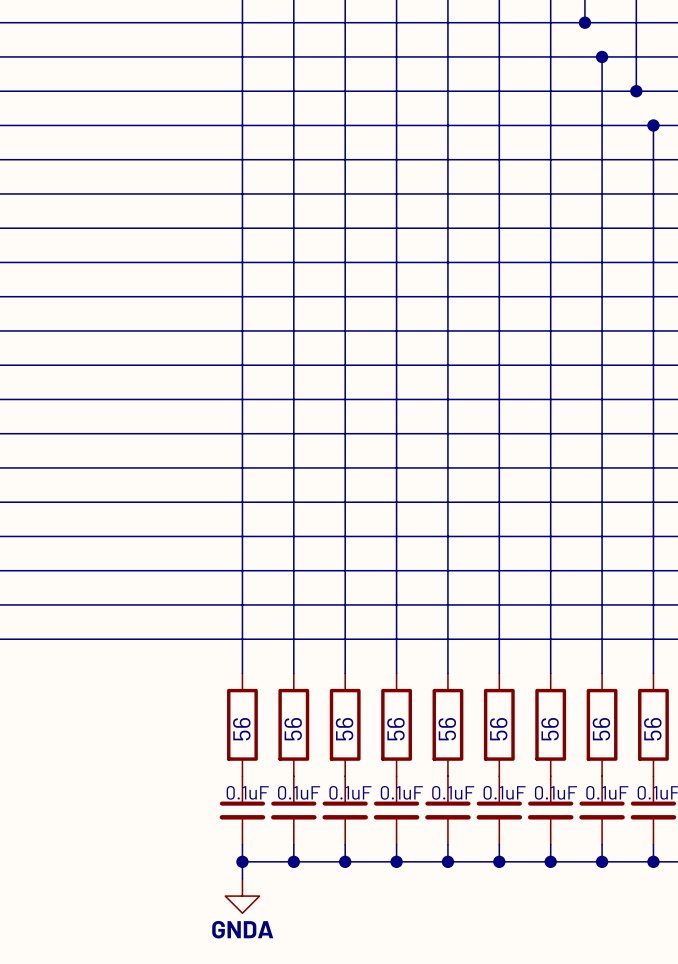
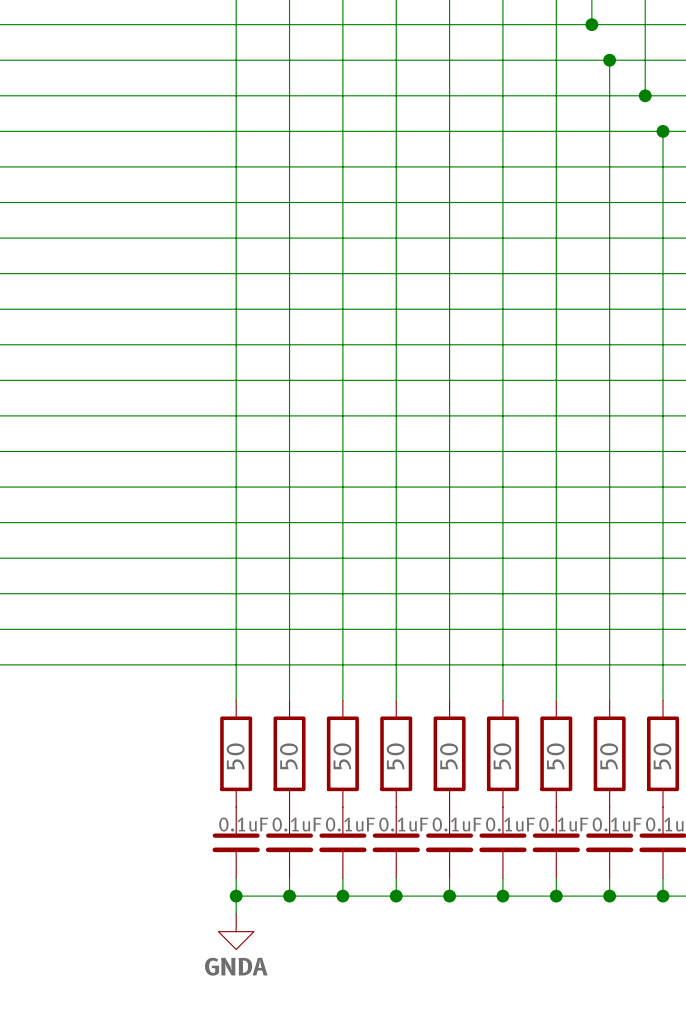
part value: 56 (241, 729) -> 50 (235, 756)
part value: 56 (293, 729) -> 50 (288, 756)
part value: 56 (344, 729) -> 50 (342, 756)
part value: 56 (395, 729) -> 50 (395, 756)
part value: 56 (447, 729) -> 50 (449, 756)
part value: 56 (498, 729) -> 50 (502, 756)
part value: 56 (550, 729) -> 50 (555, 756)
part value: 56 (601, 729) -> 50 (609, 756)
part value: 56 (652, 729) -> 50 (662, 756)

